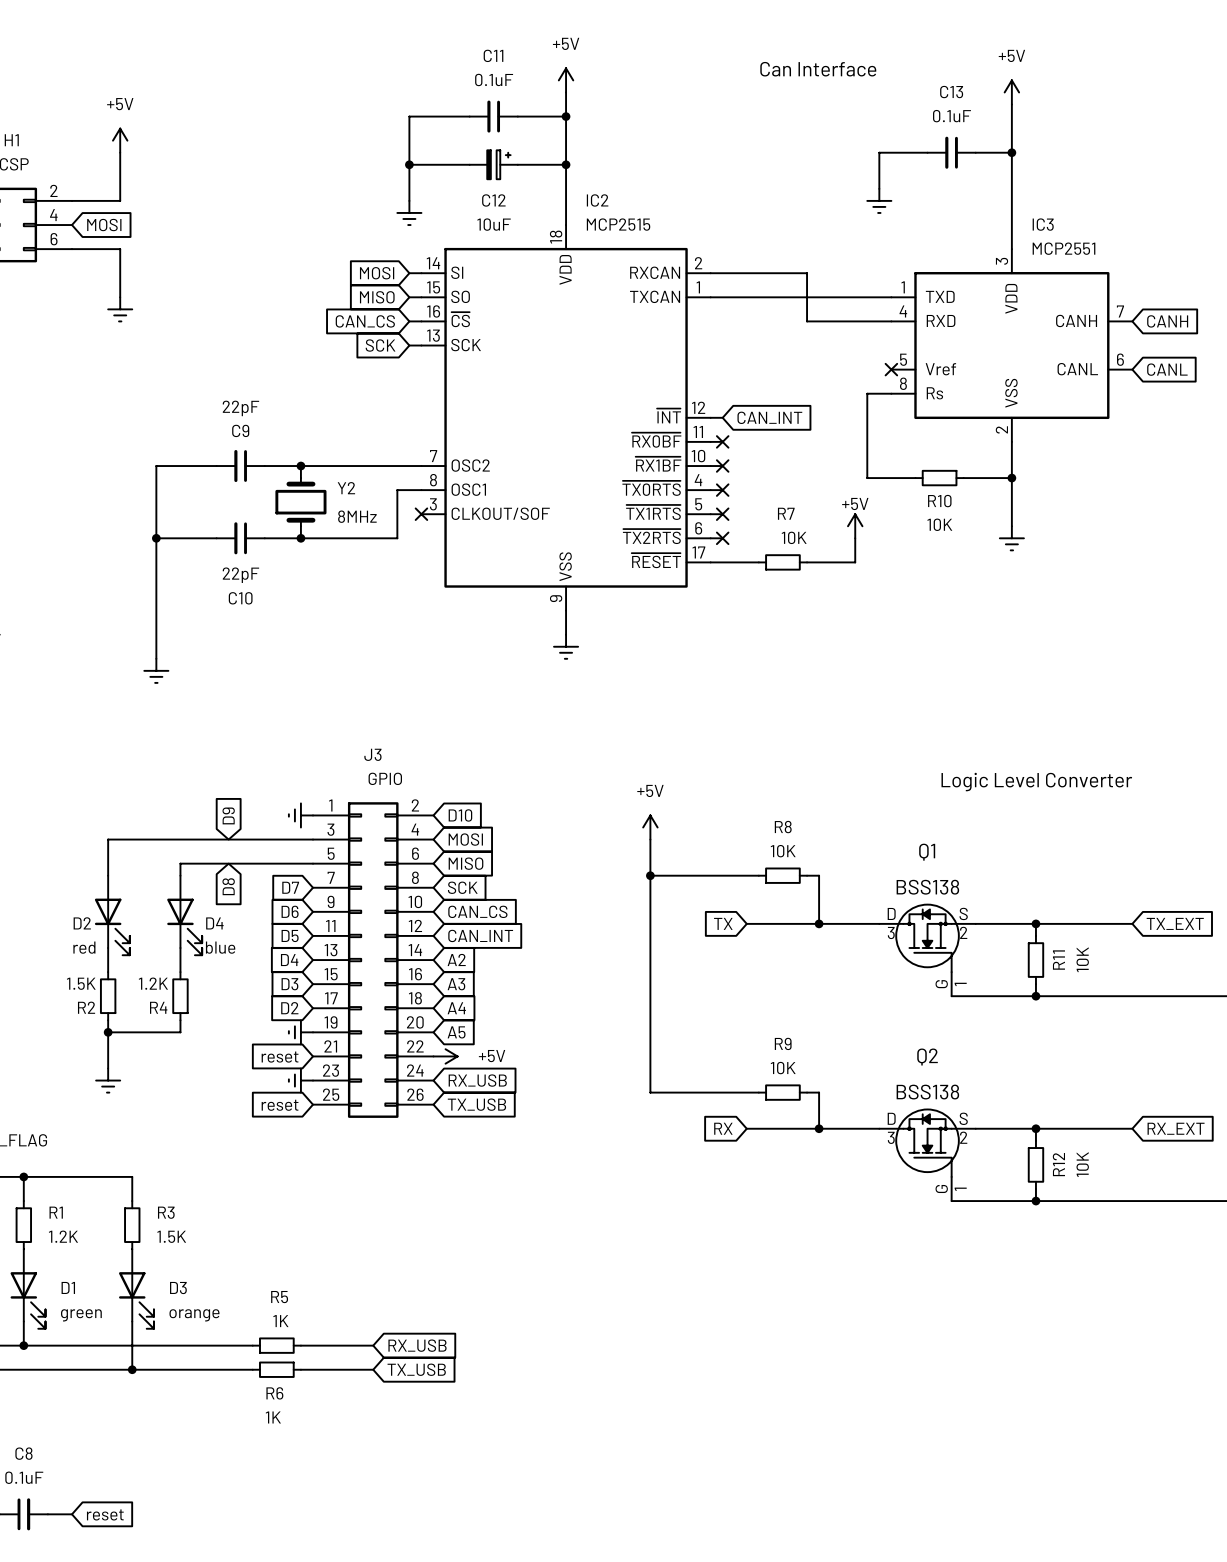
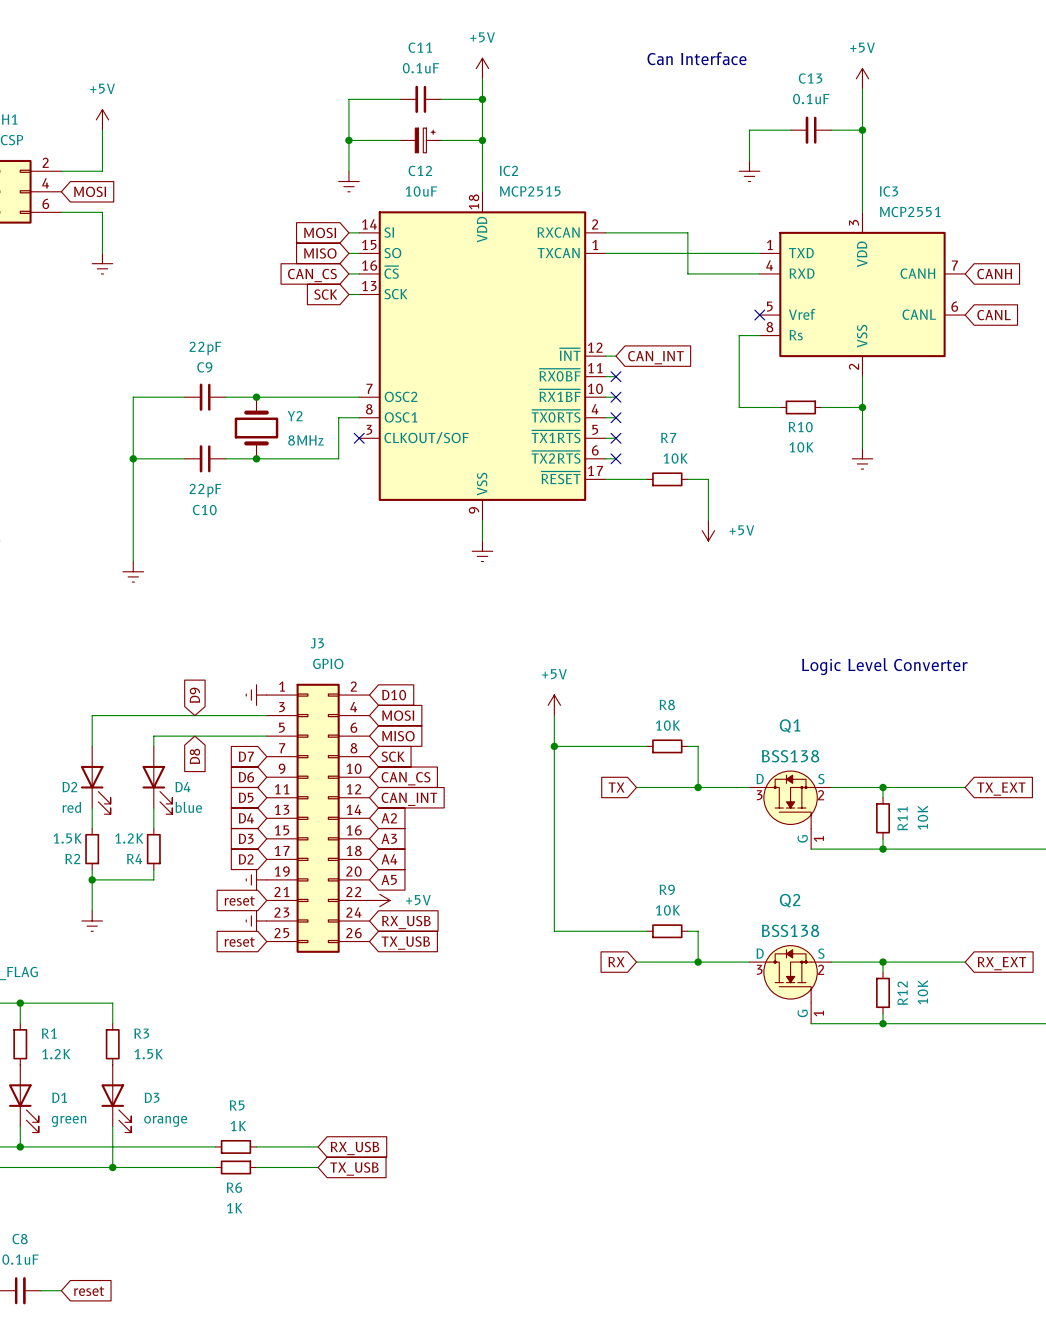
power symbol text position: +5V (855, 503) -> +5V (741, 530)
power symbol rotation: 0° (855, 526) -> 180° (708, 530)
power symbol position: +5V (855, 526) -> +5V (708, 530)
wire: (855, 538) (855, 562) (831, 562) -> (708, 520) (708, 479)

